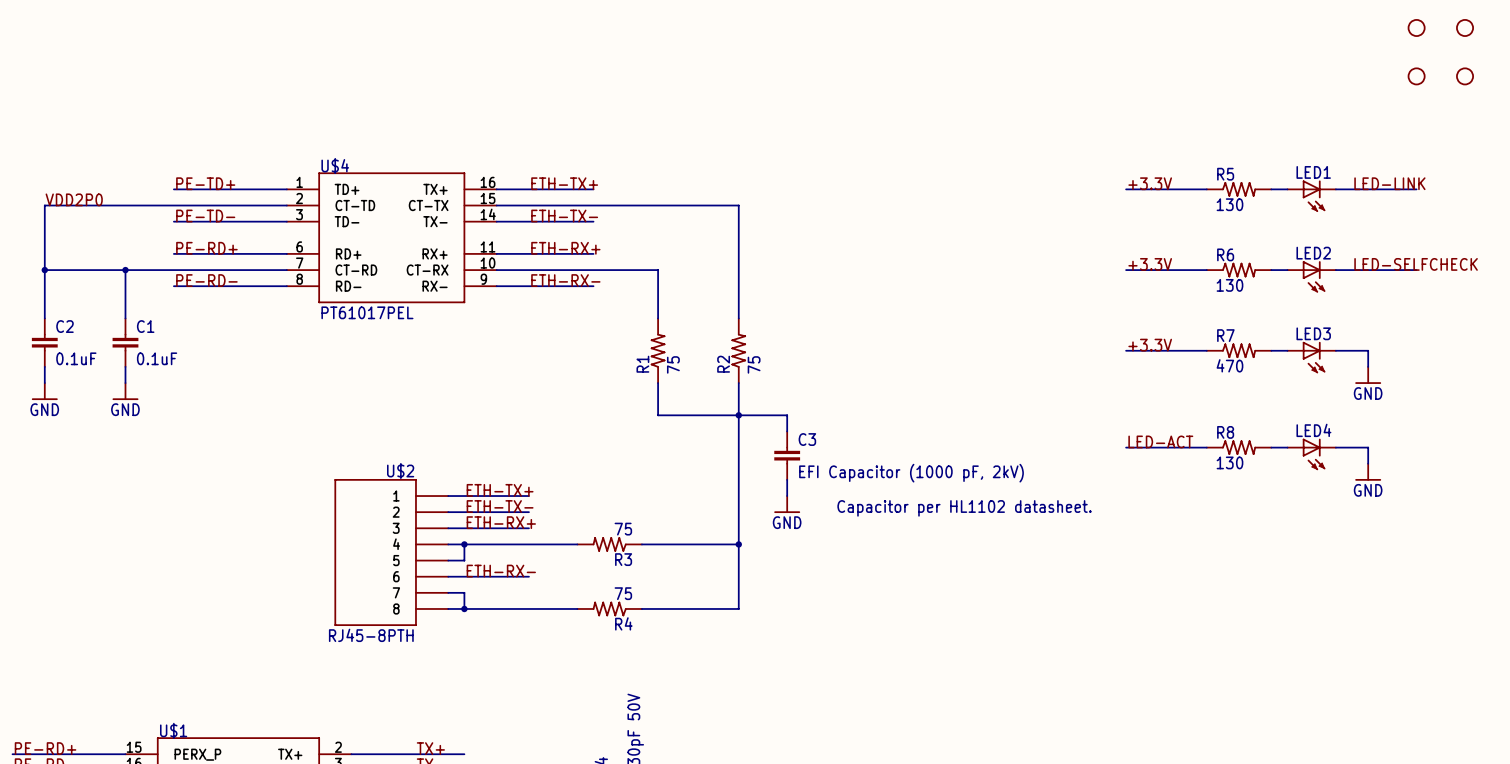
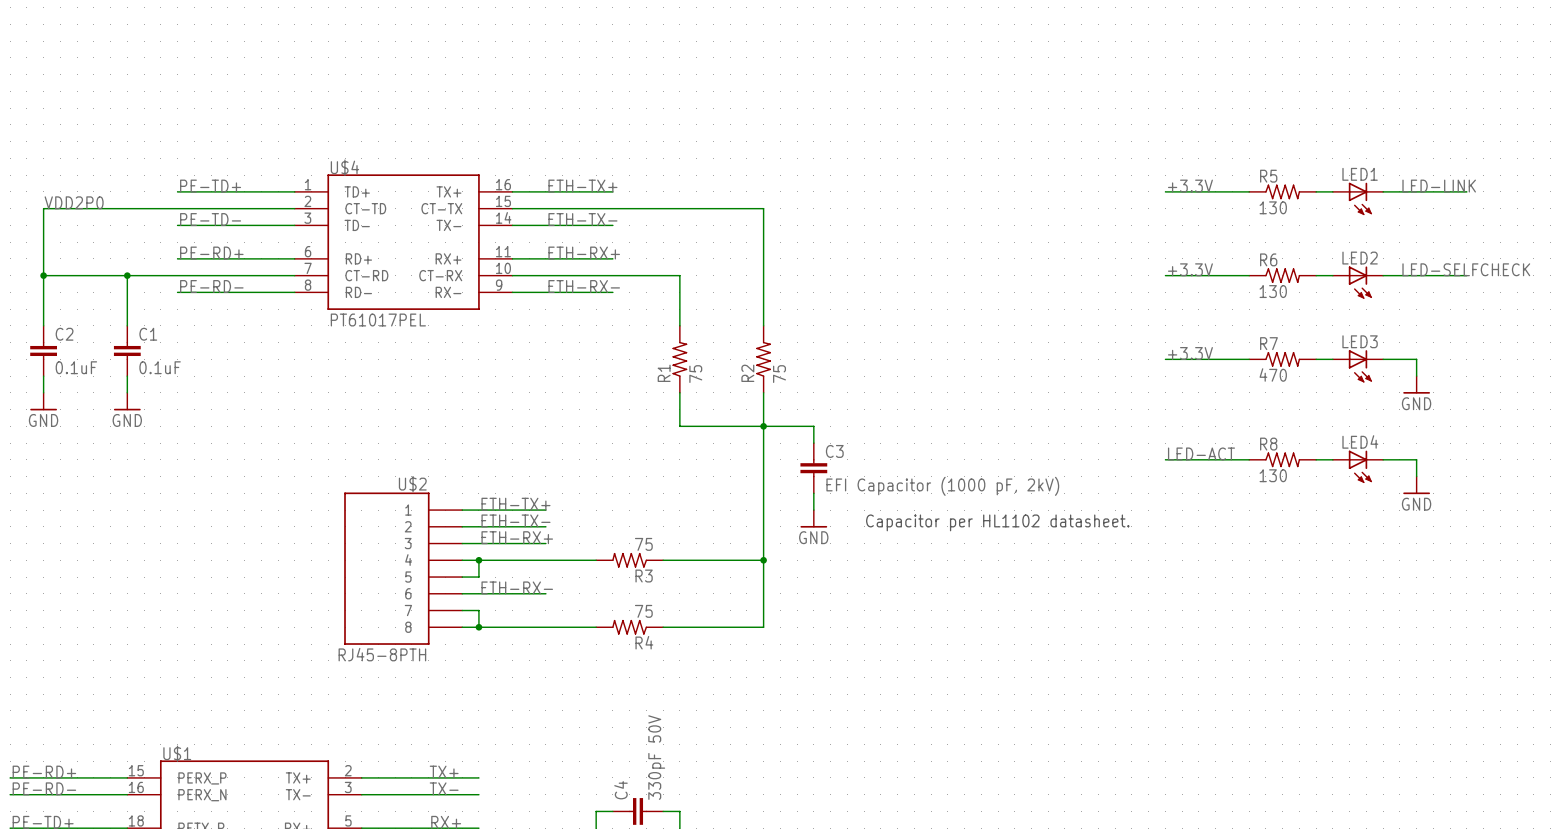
part: (1416, 27) -> none
part: (1465, 27) -> none
part: (1416, 76) -> none
part: (1465, 76) -> none

